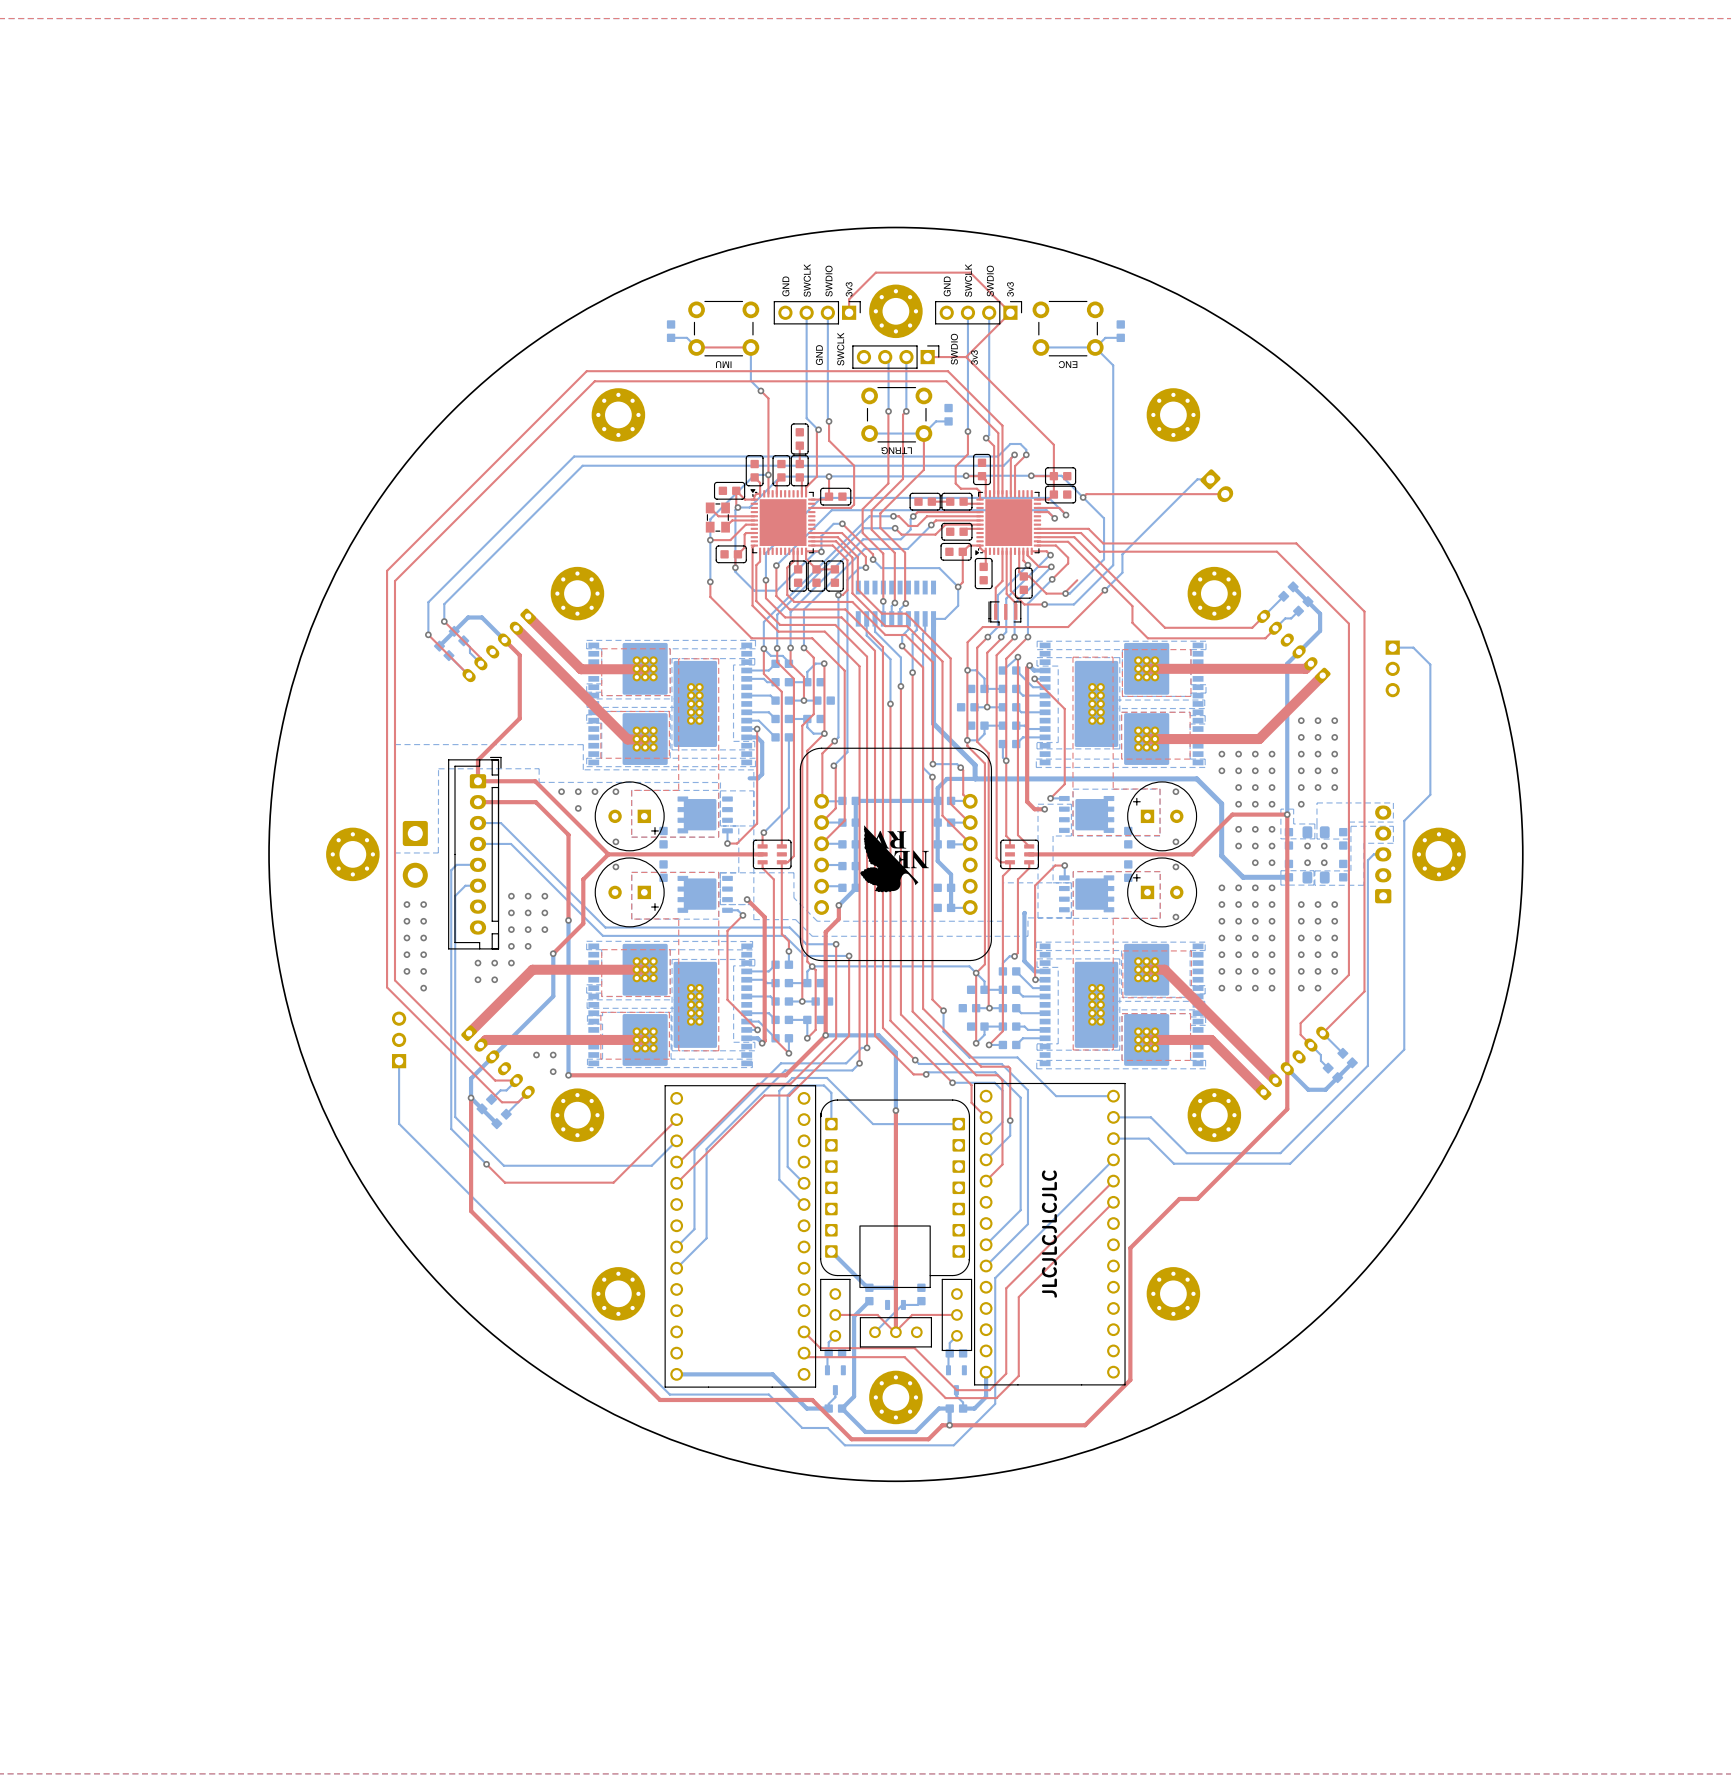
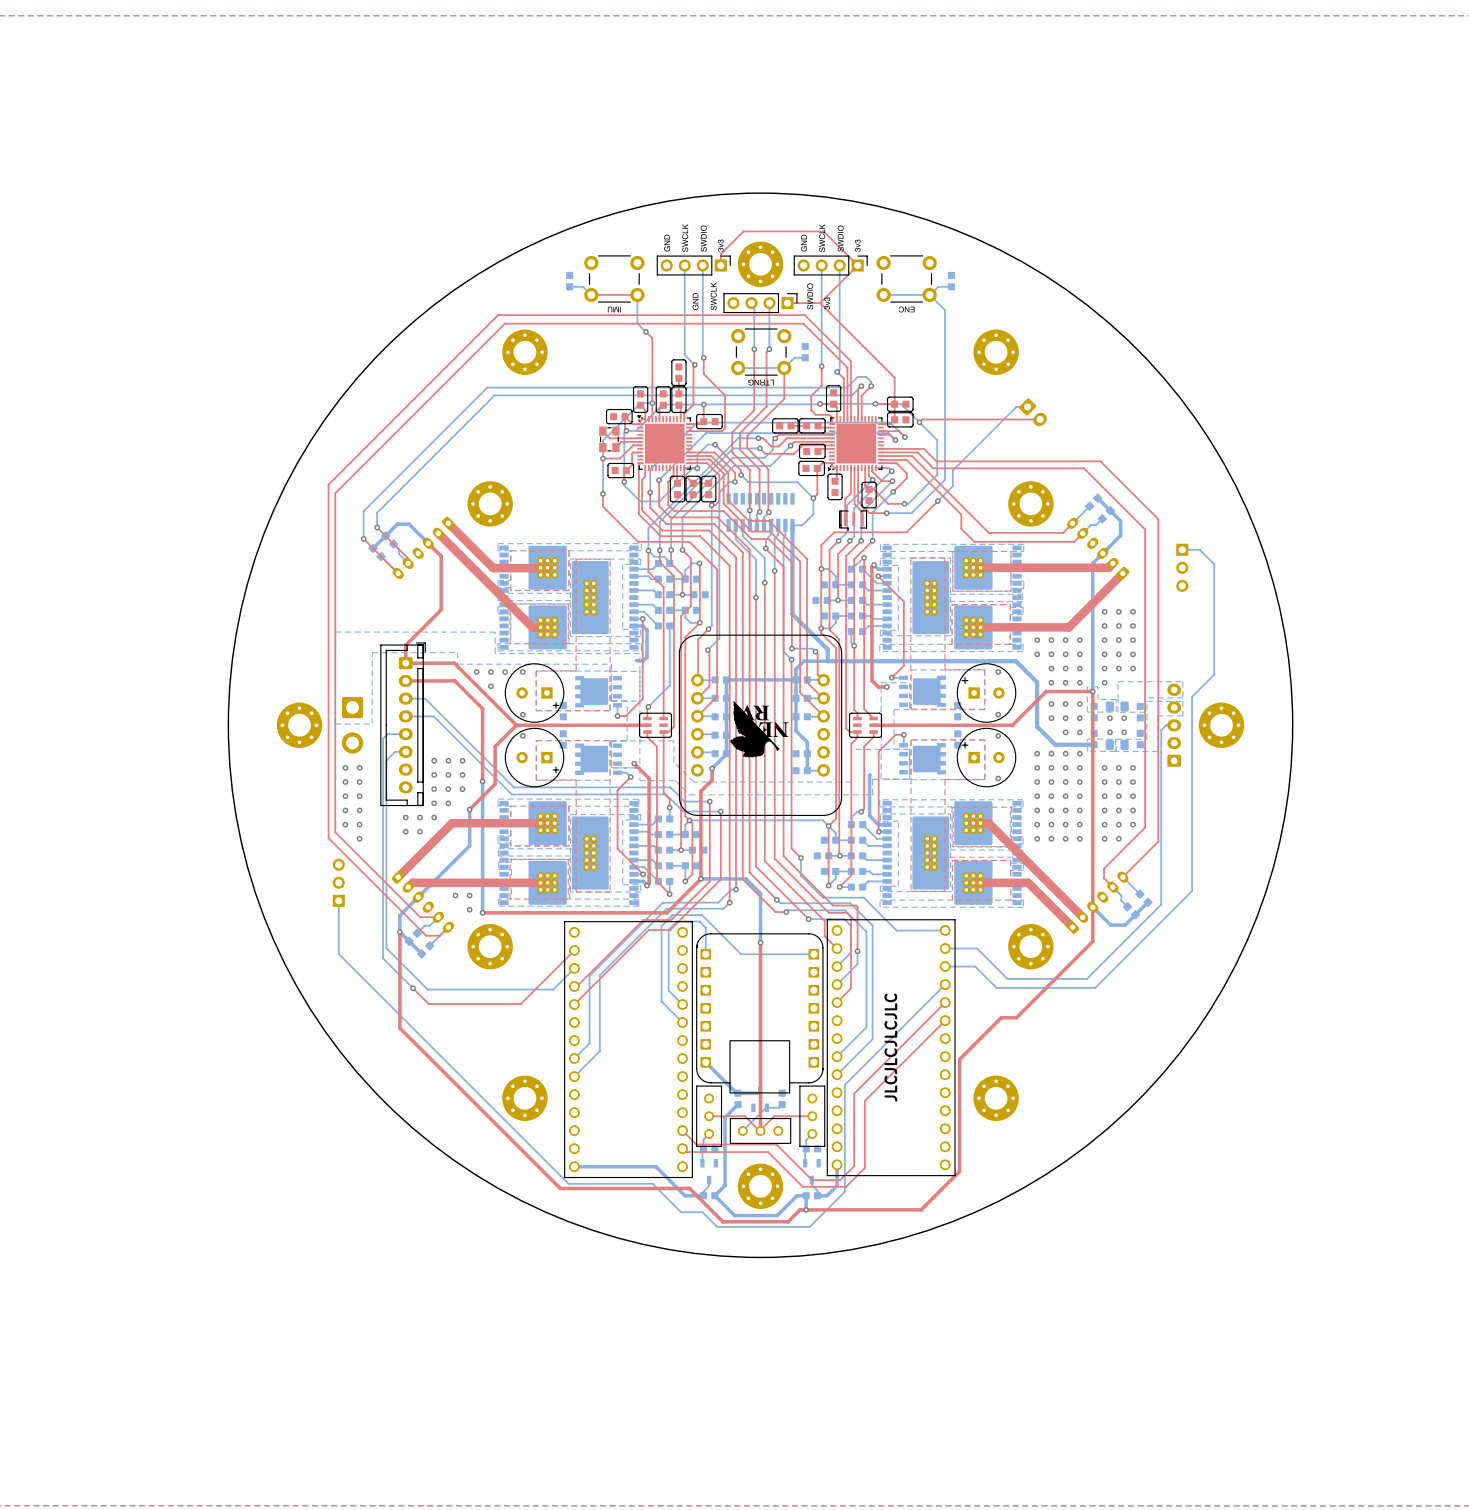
top track: (1077, 580) (1065, 591) -> none

